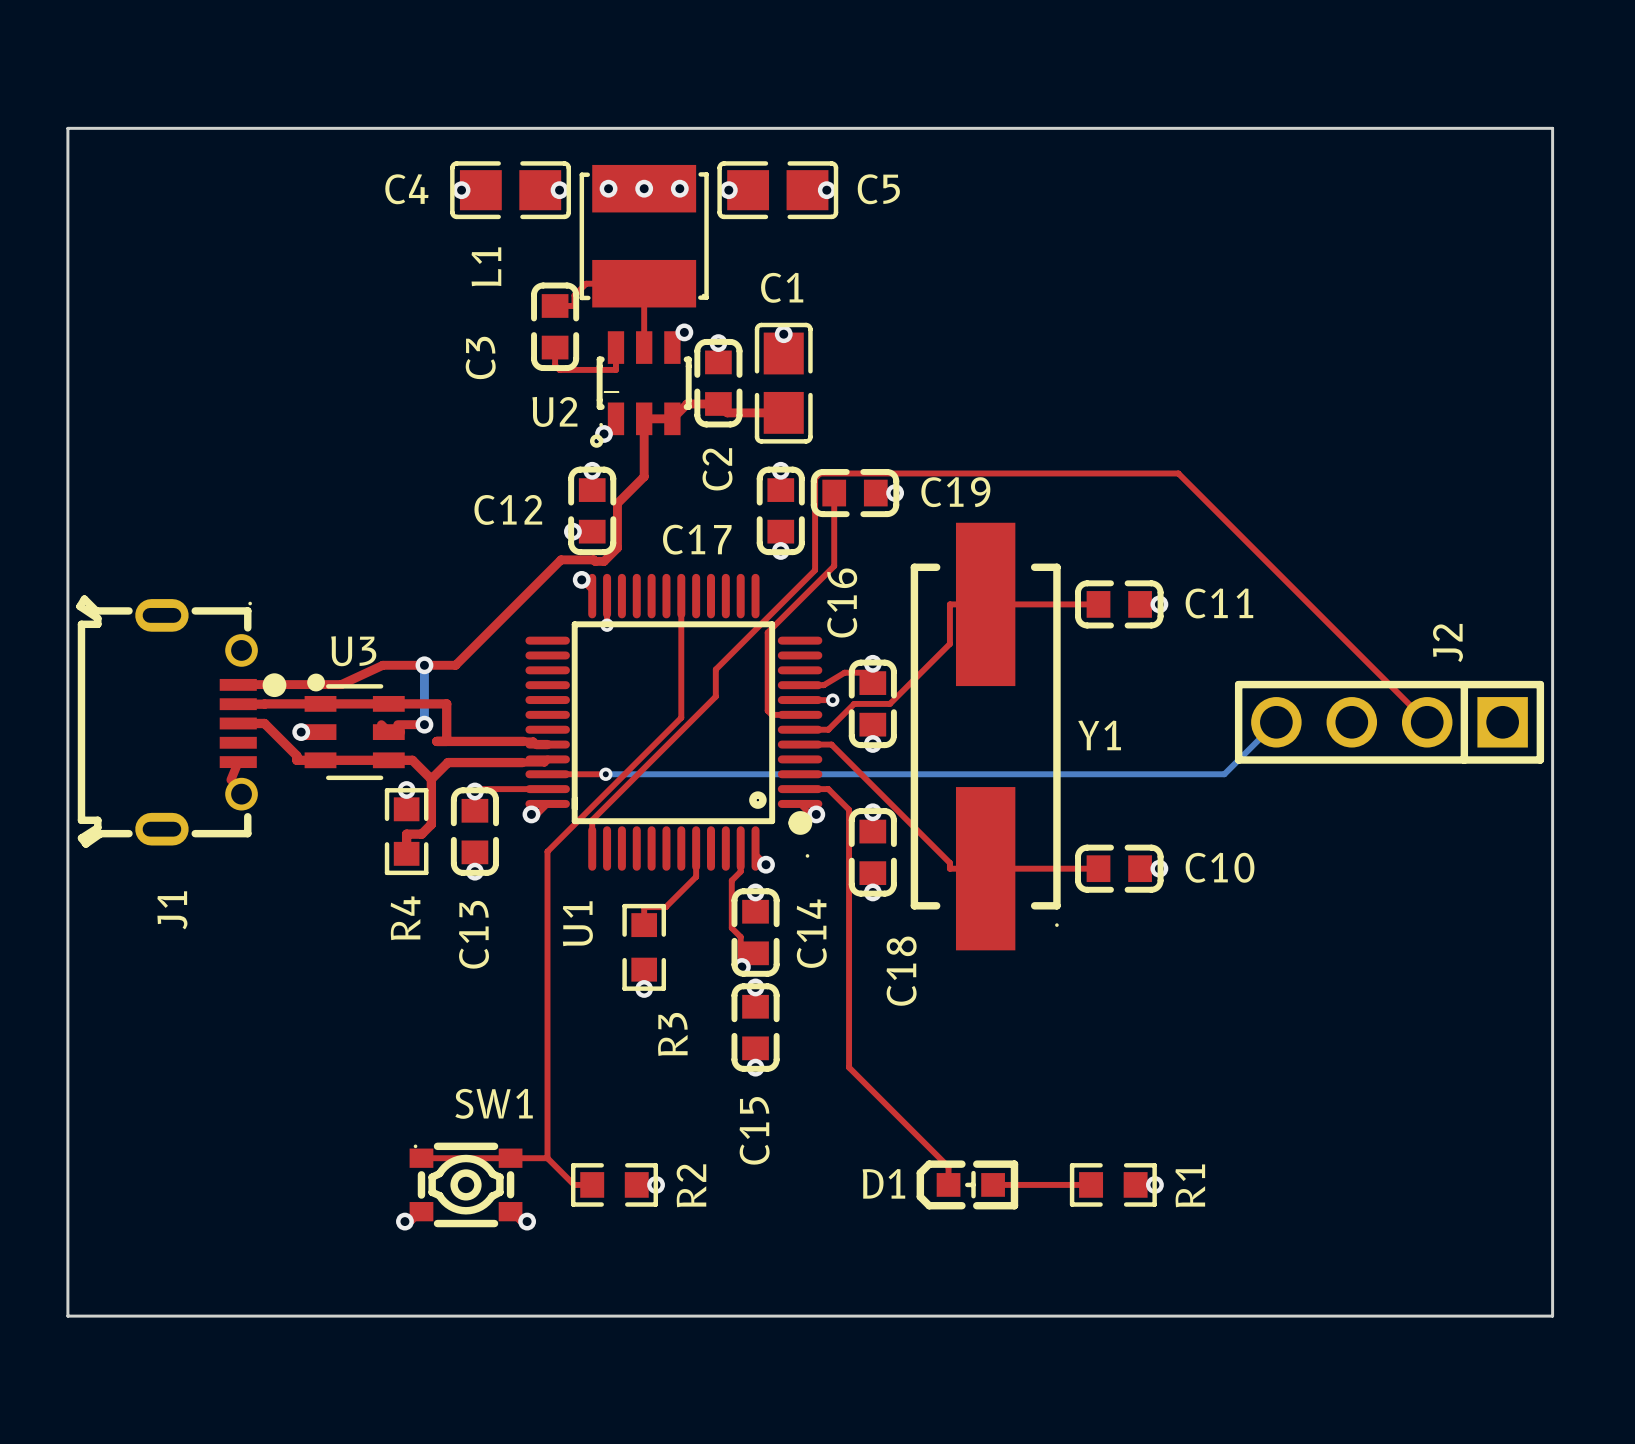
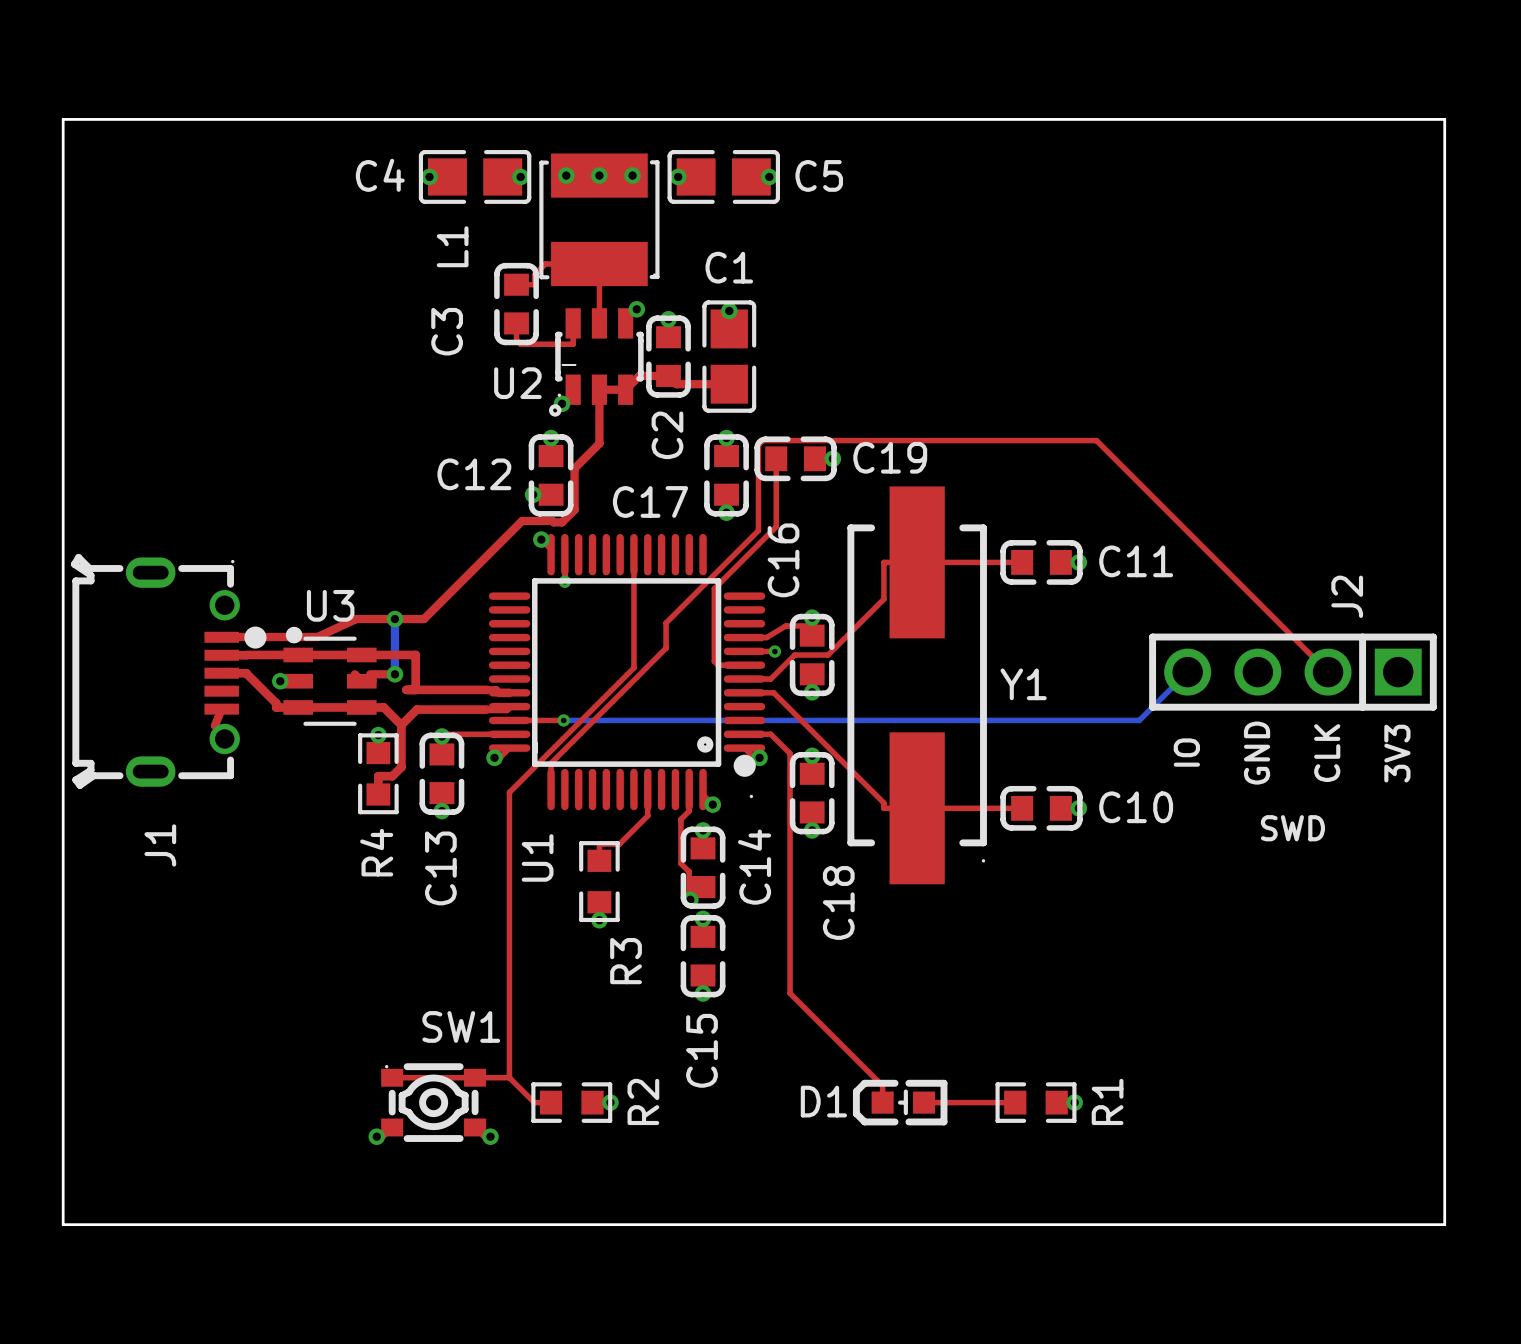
text: none -> CLK (1327, 753)
text: none -> IO (1186, 752)
text: none -> GND (1257, 753)
text: none -> 3V3 (1397, 753)
text: none -> SWD (1292, 828)

